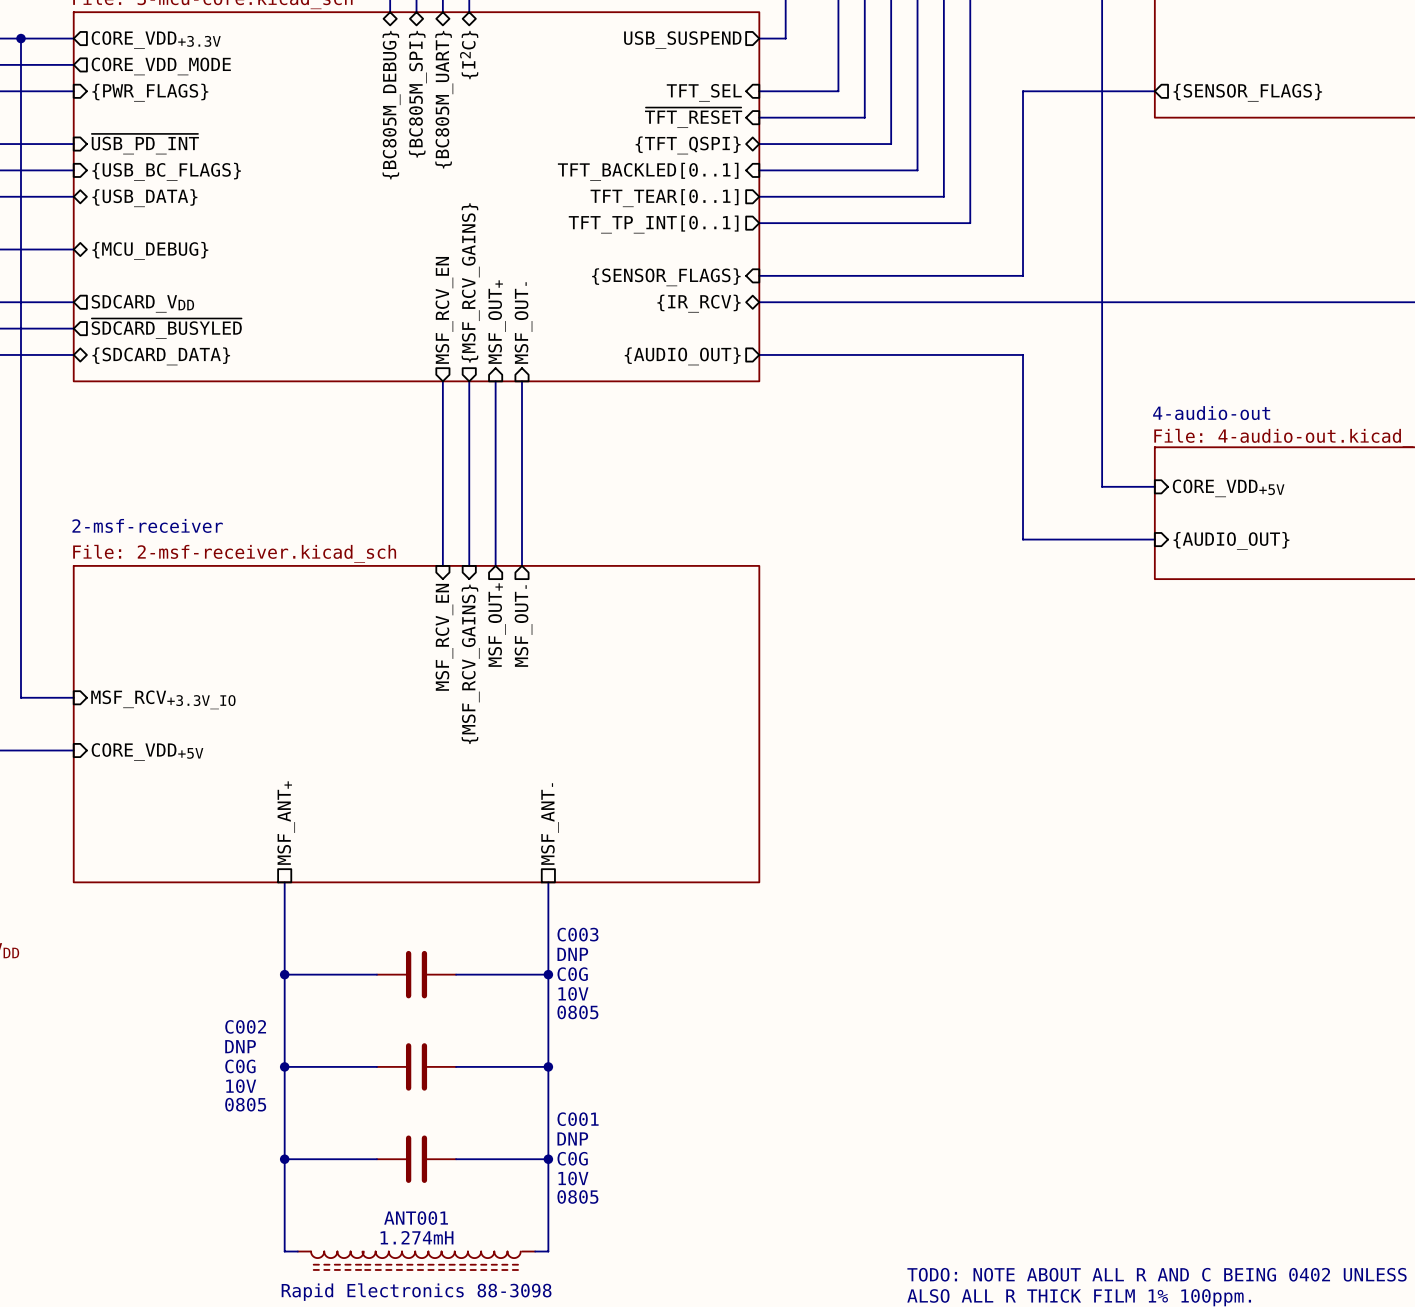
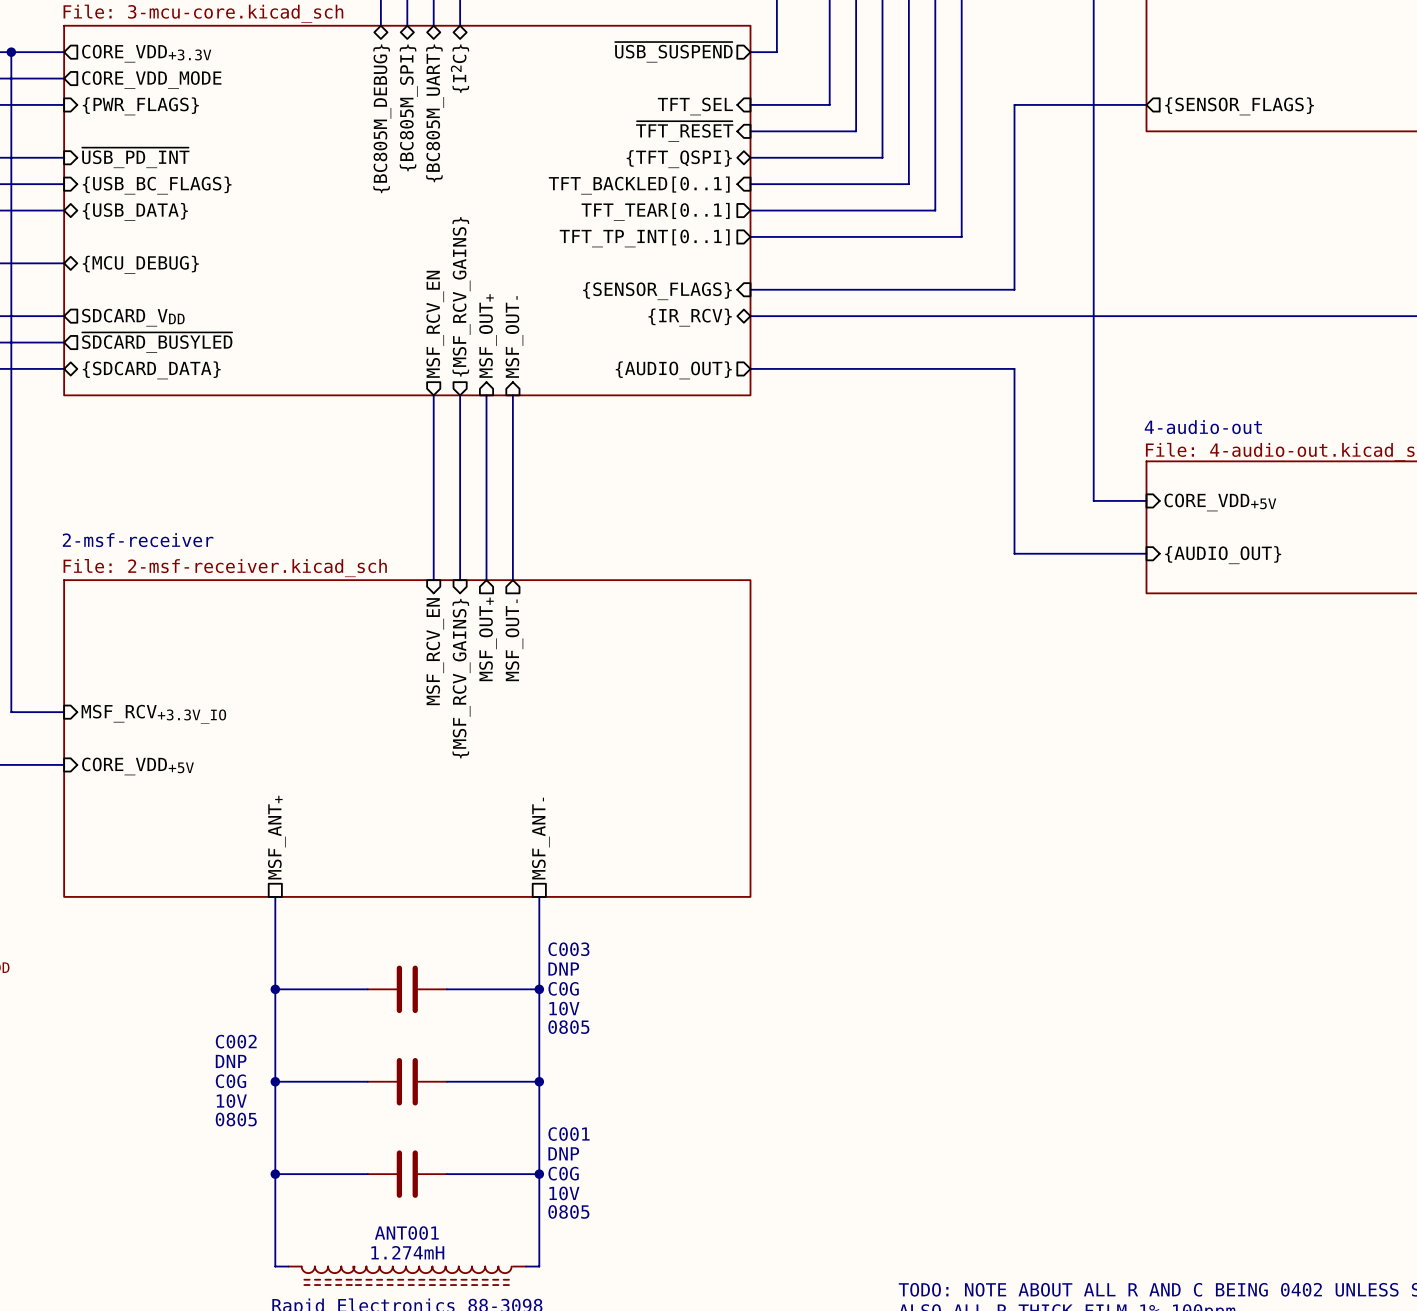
sheet pin: USB_SUSPEND (682, 40) -> ~{USB_SUSPEND} (673, 52)

